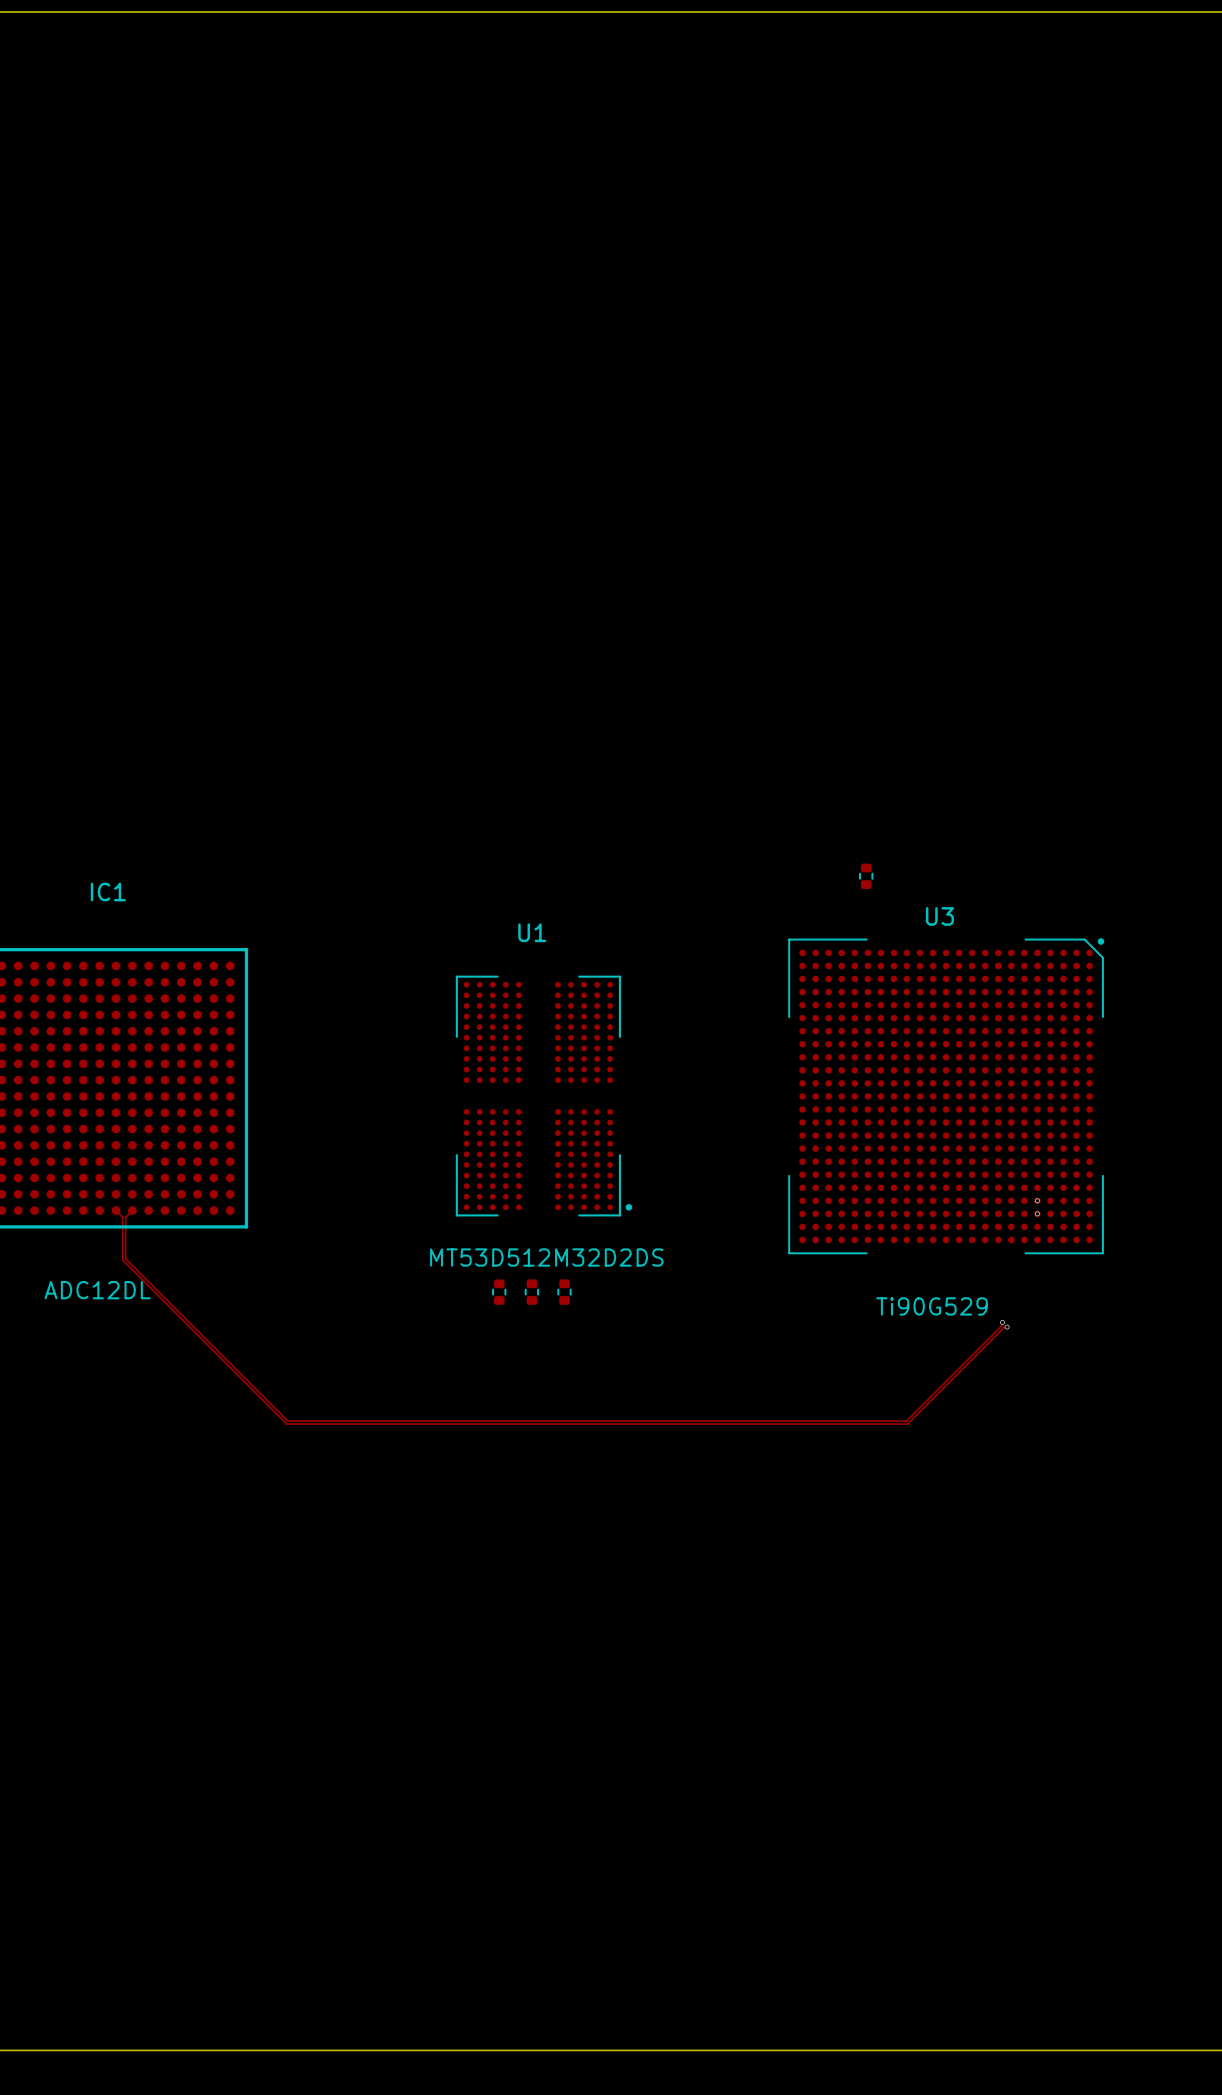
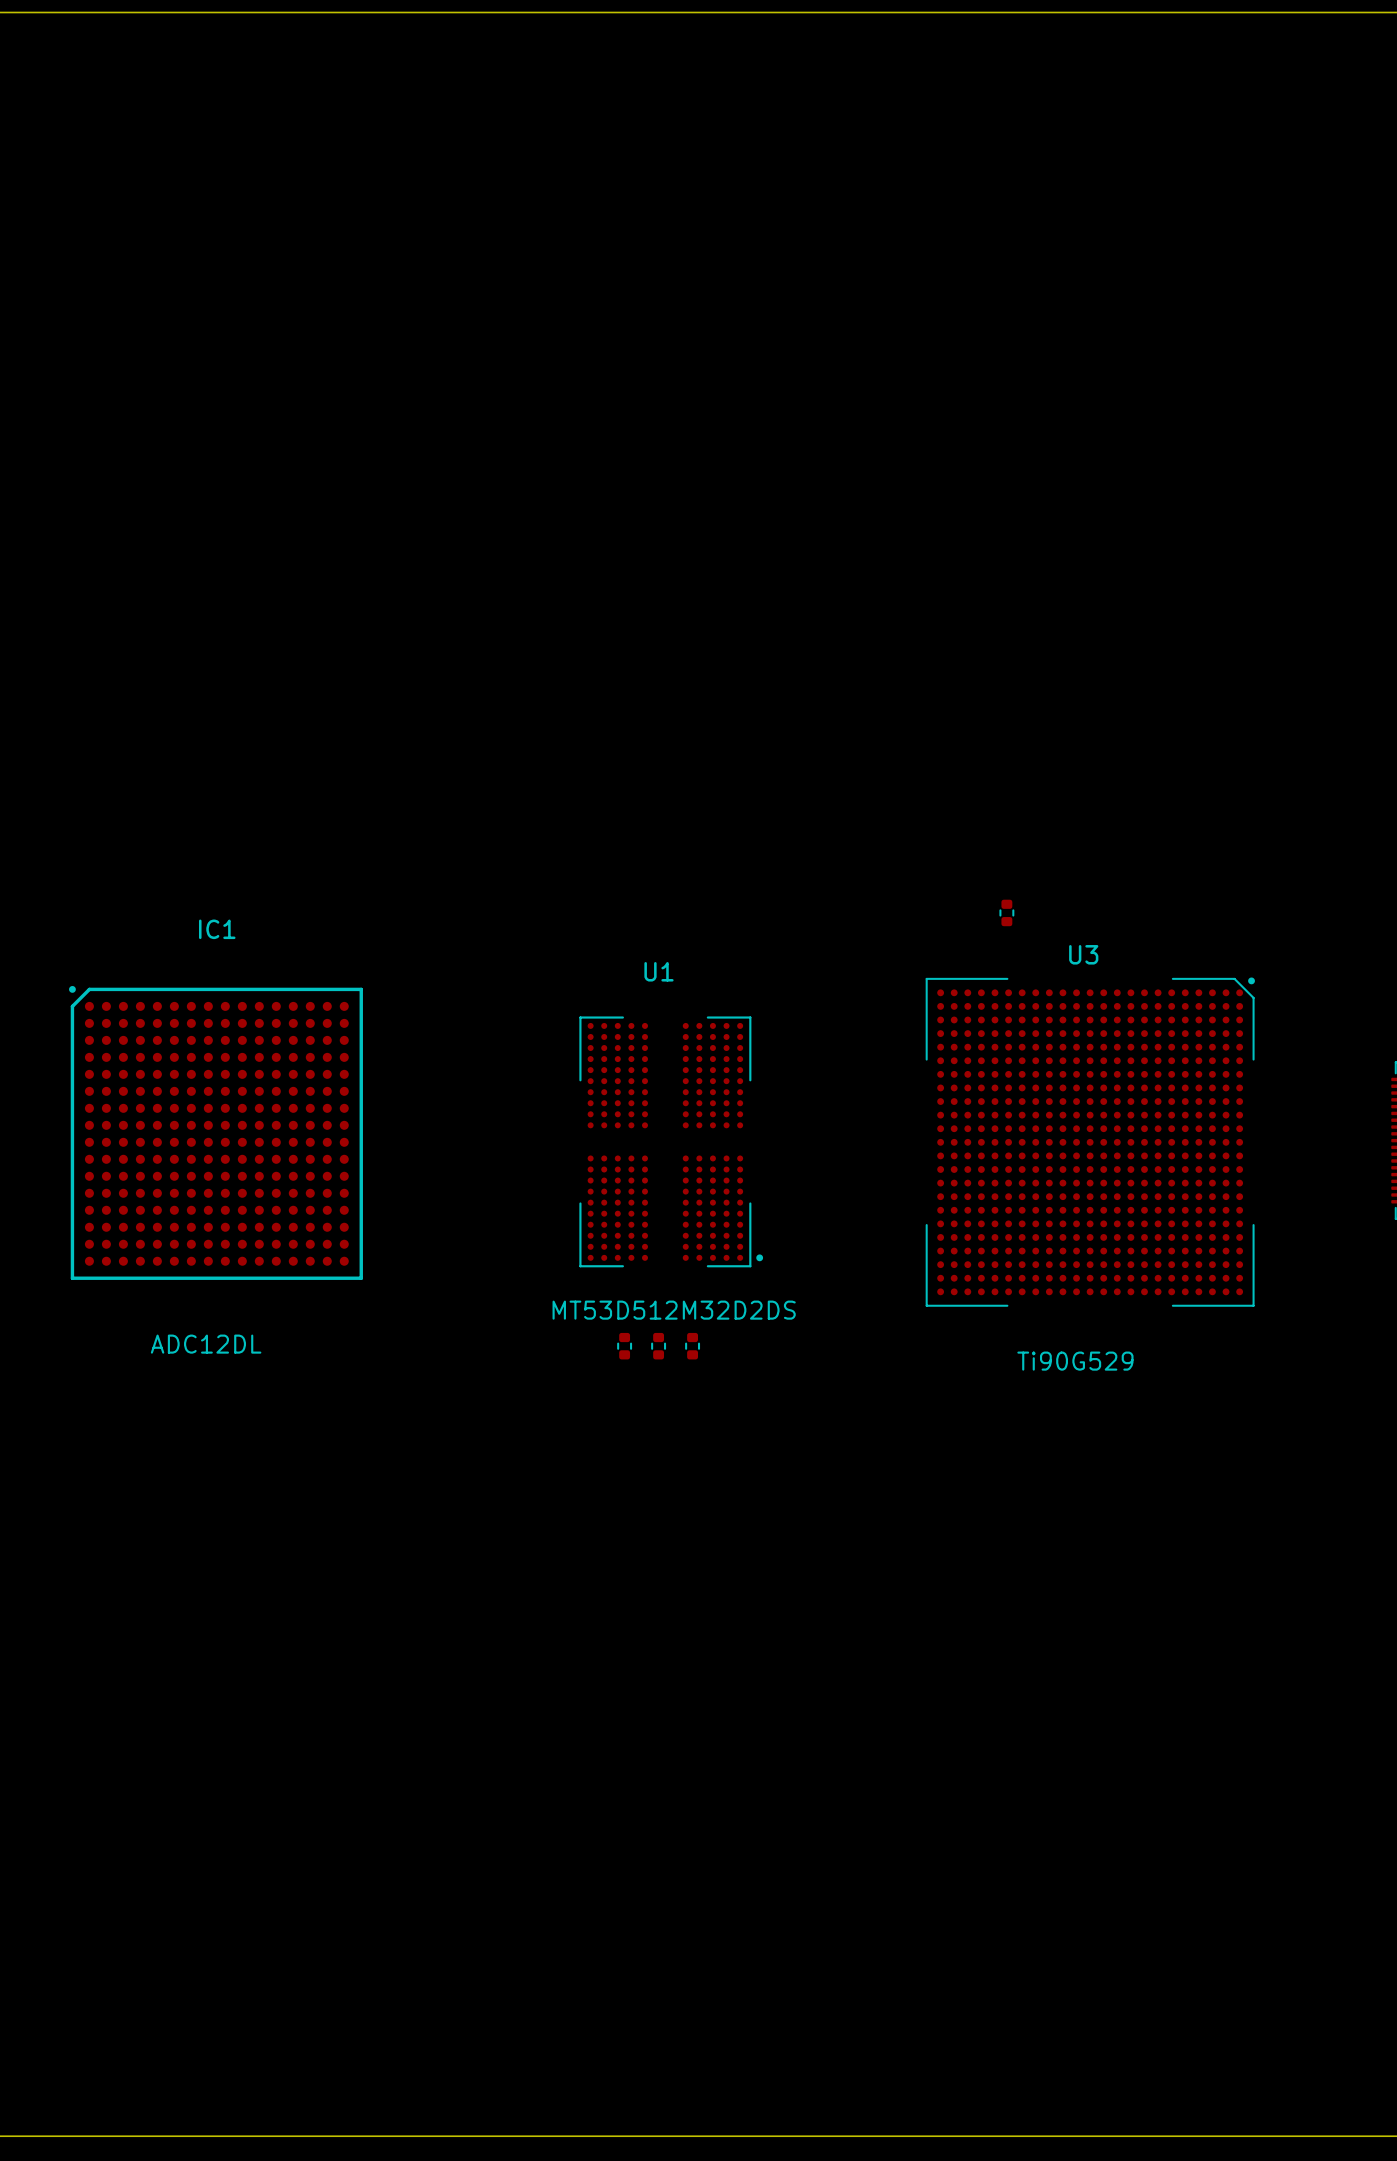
via: (1037, 1200) -> none
track: (116, 1210) (122, 1217) (122, 1260) (286, 1424) (907, 1424) (1004, 1327) (1007, 1327) -> none
track: (132, 1210) (125, 1217) (125, 1258) (287, 1421) (906, 1421) (1002, 1324) (1002, 1322) -> none
via: (1037, 1213) -> none
via: (1002, 1322) -> none
via: (1007, 1327) -> none

